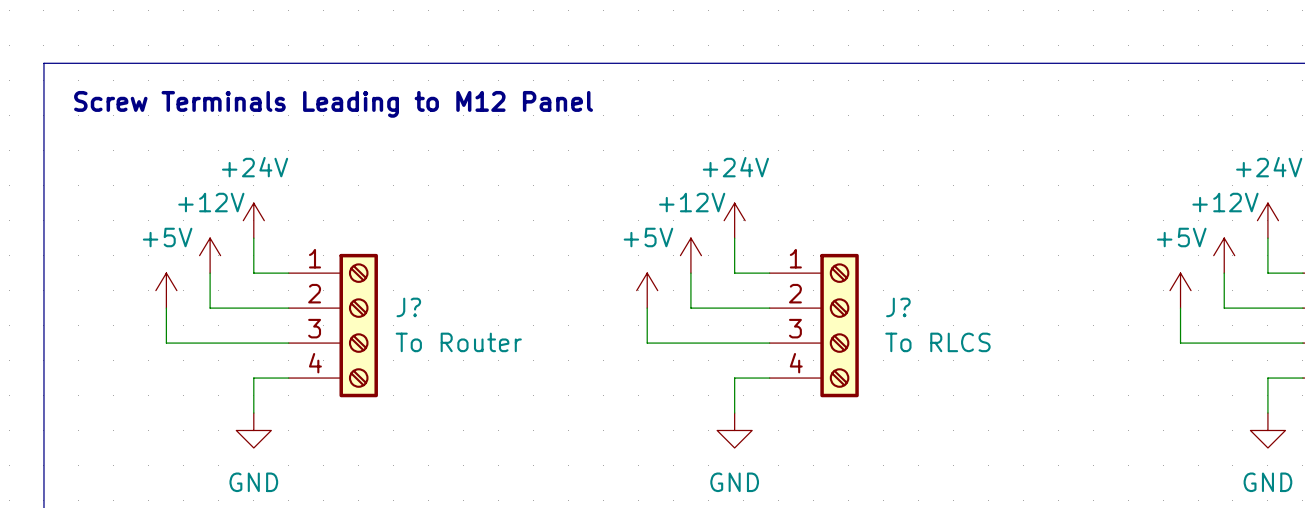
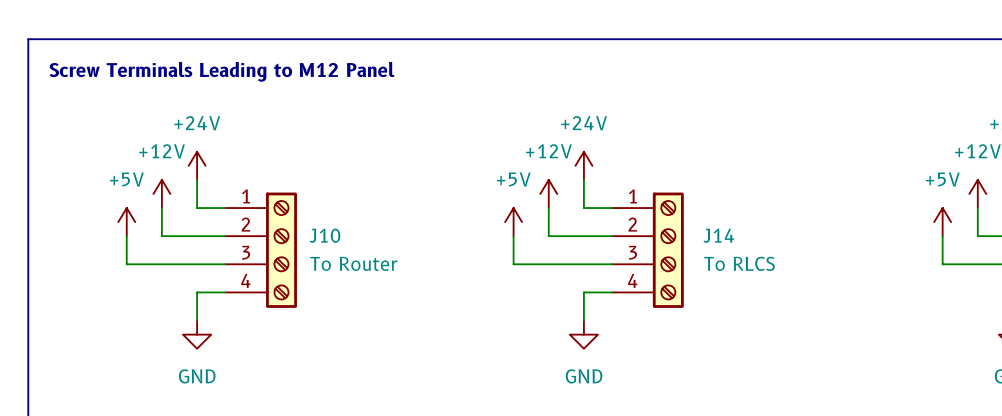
J? name: J? (408, 307) -> J10 (324, 235)
J? name: J? (898, 307) -> J14 (718, 235)

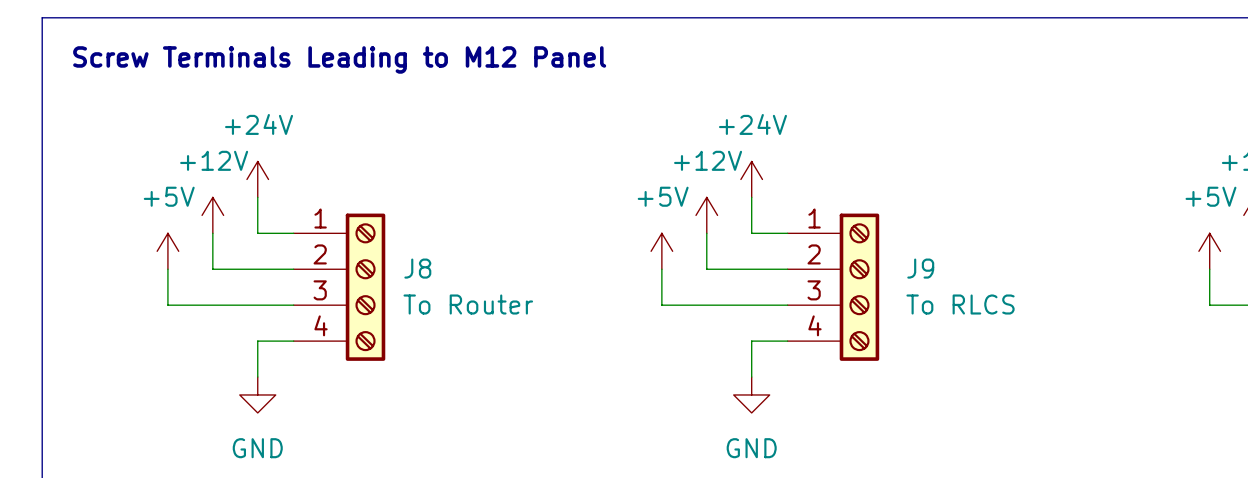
J10 name: J10 (324, 235) -> J8 (417, 268)
J14 name: J14 (718, 235) -> J9 (920, 268)

